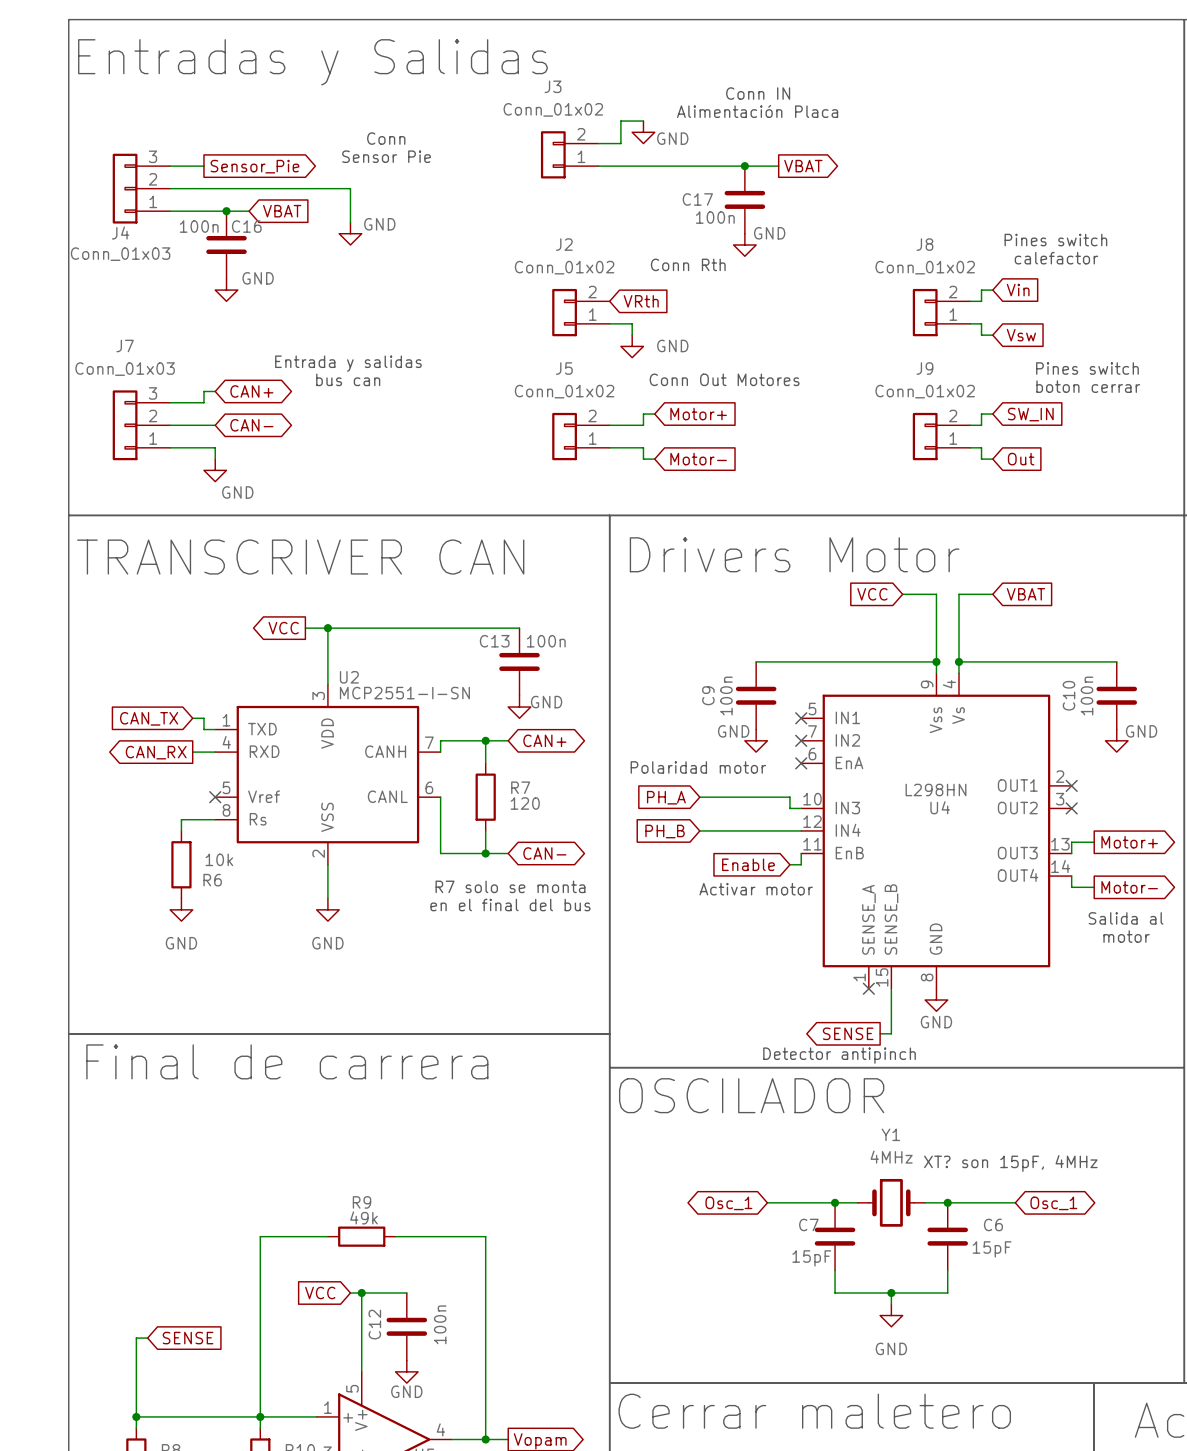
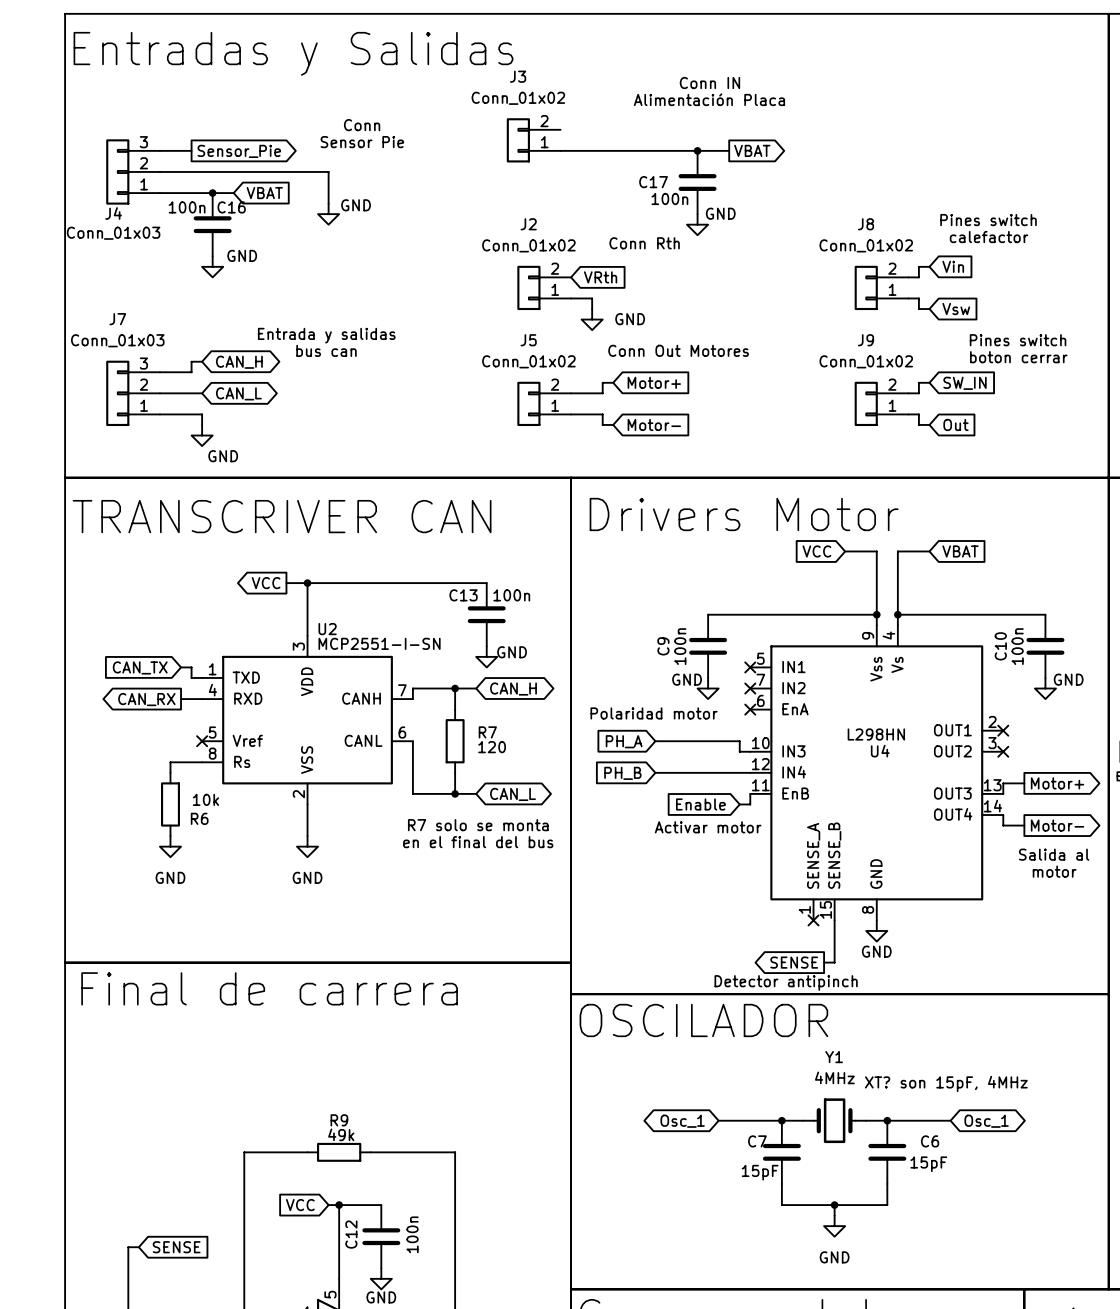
wire: (643, 121) (620, 121) (620, 143) (598, 143) -> none
power symbol: GND (643, 132) -> none
global label: CAN+ (251, 391) -> CAN_H (239, 362)
global label: CAN- (251, 425) -> CAN_L (238, 393)
global label: CAN+ (544, 740) -> CAN_H (513, 689)
global label: CAN- (544, 853) -> CAN_L (512, 794)

